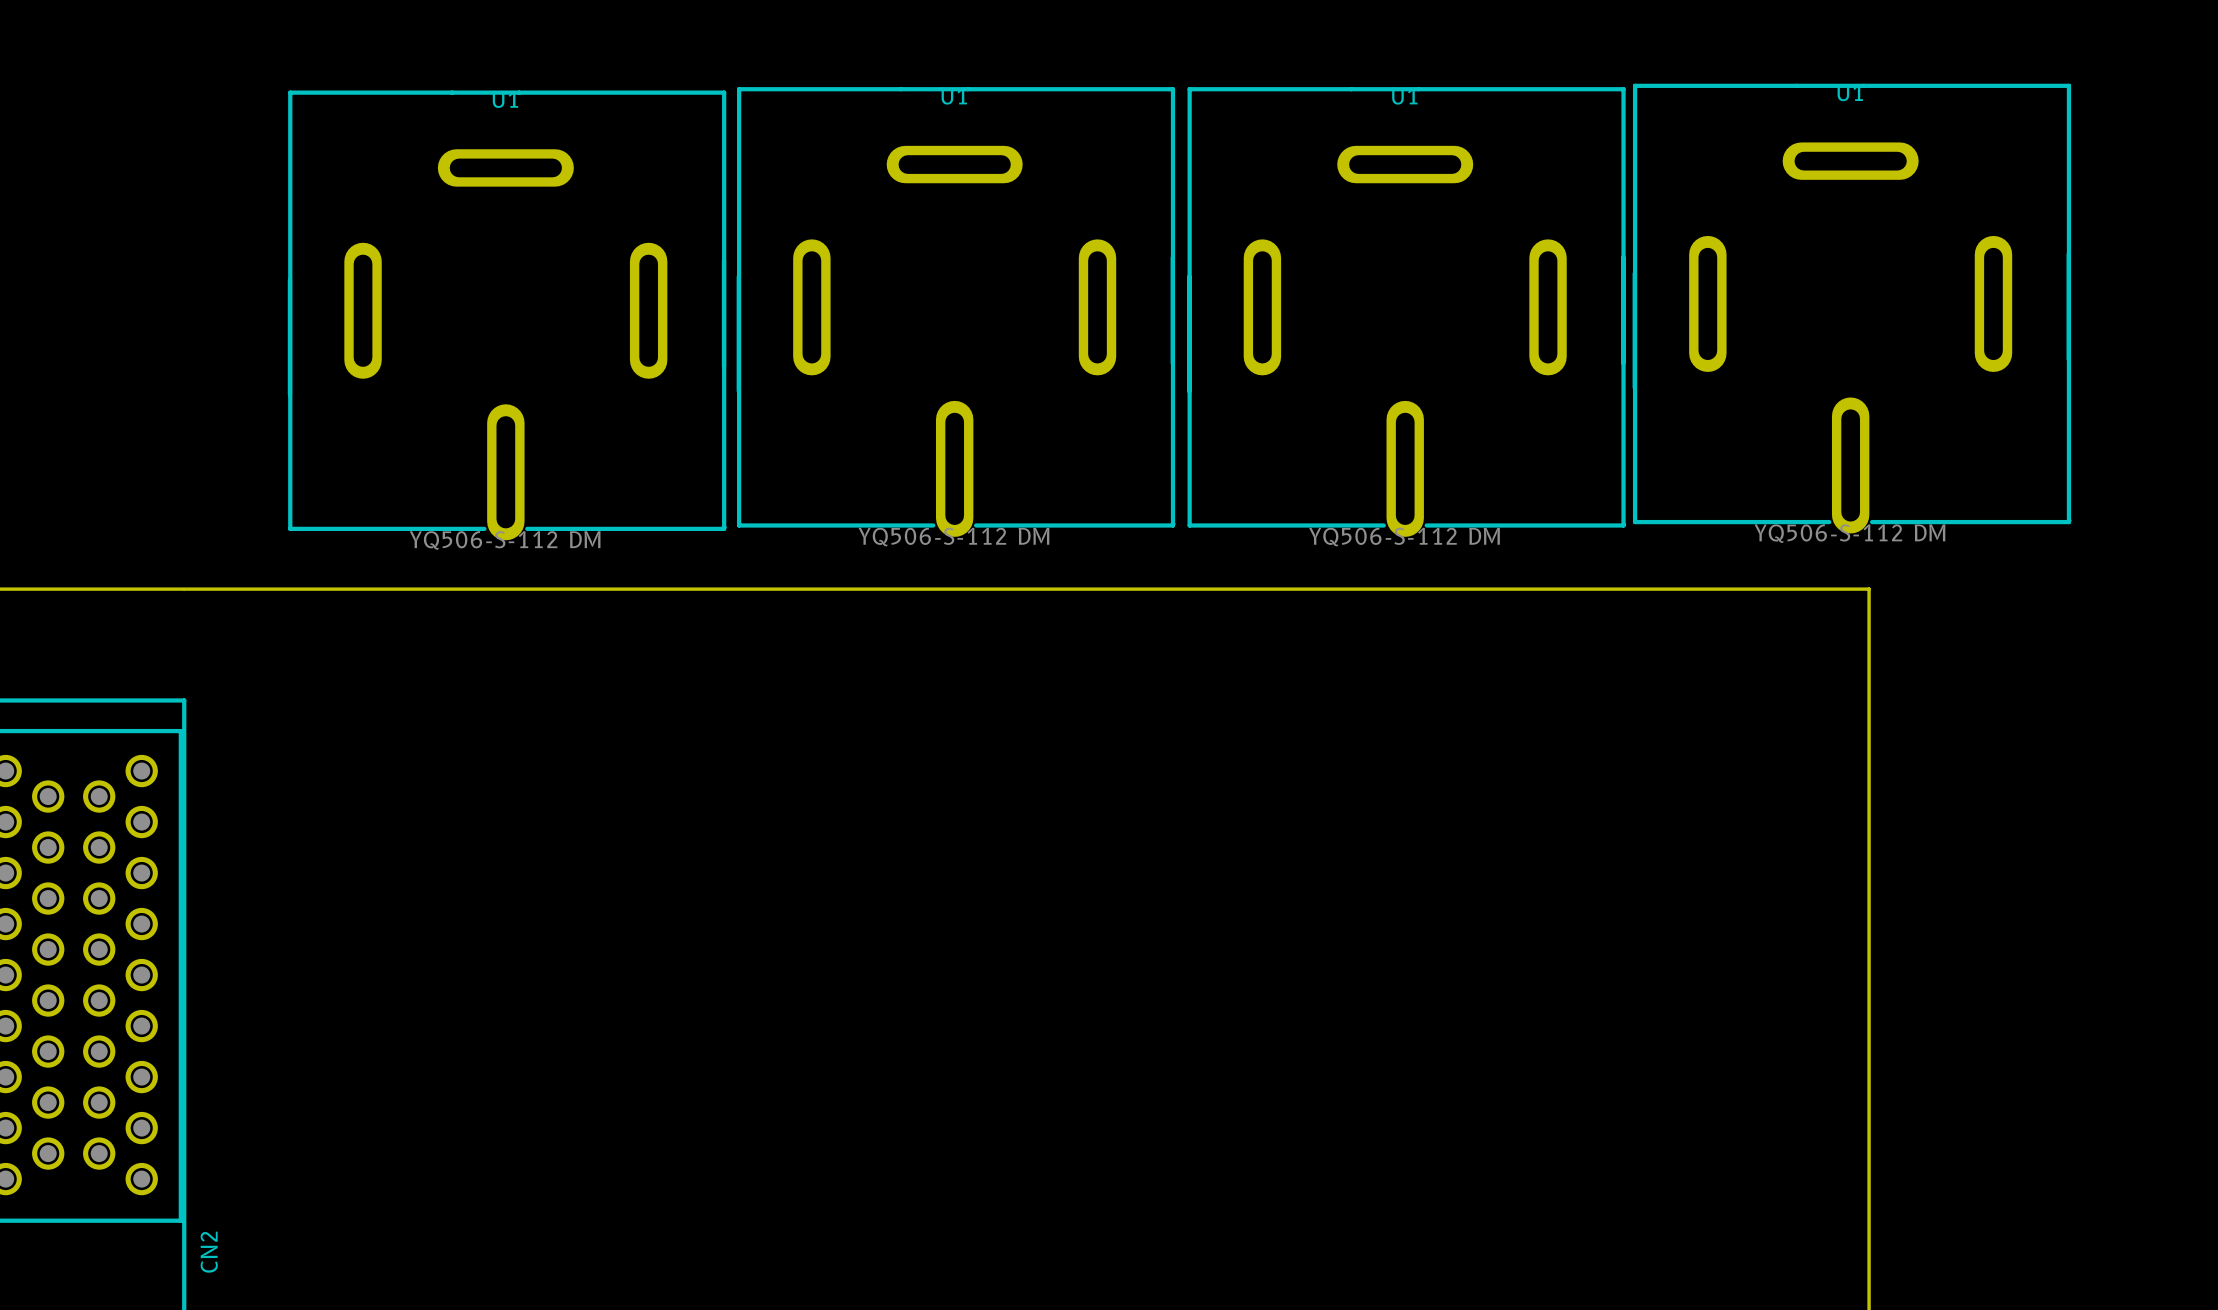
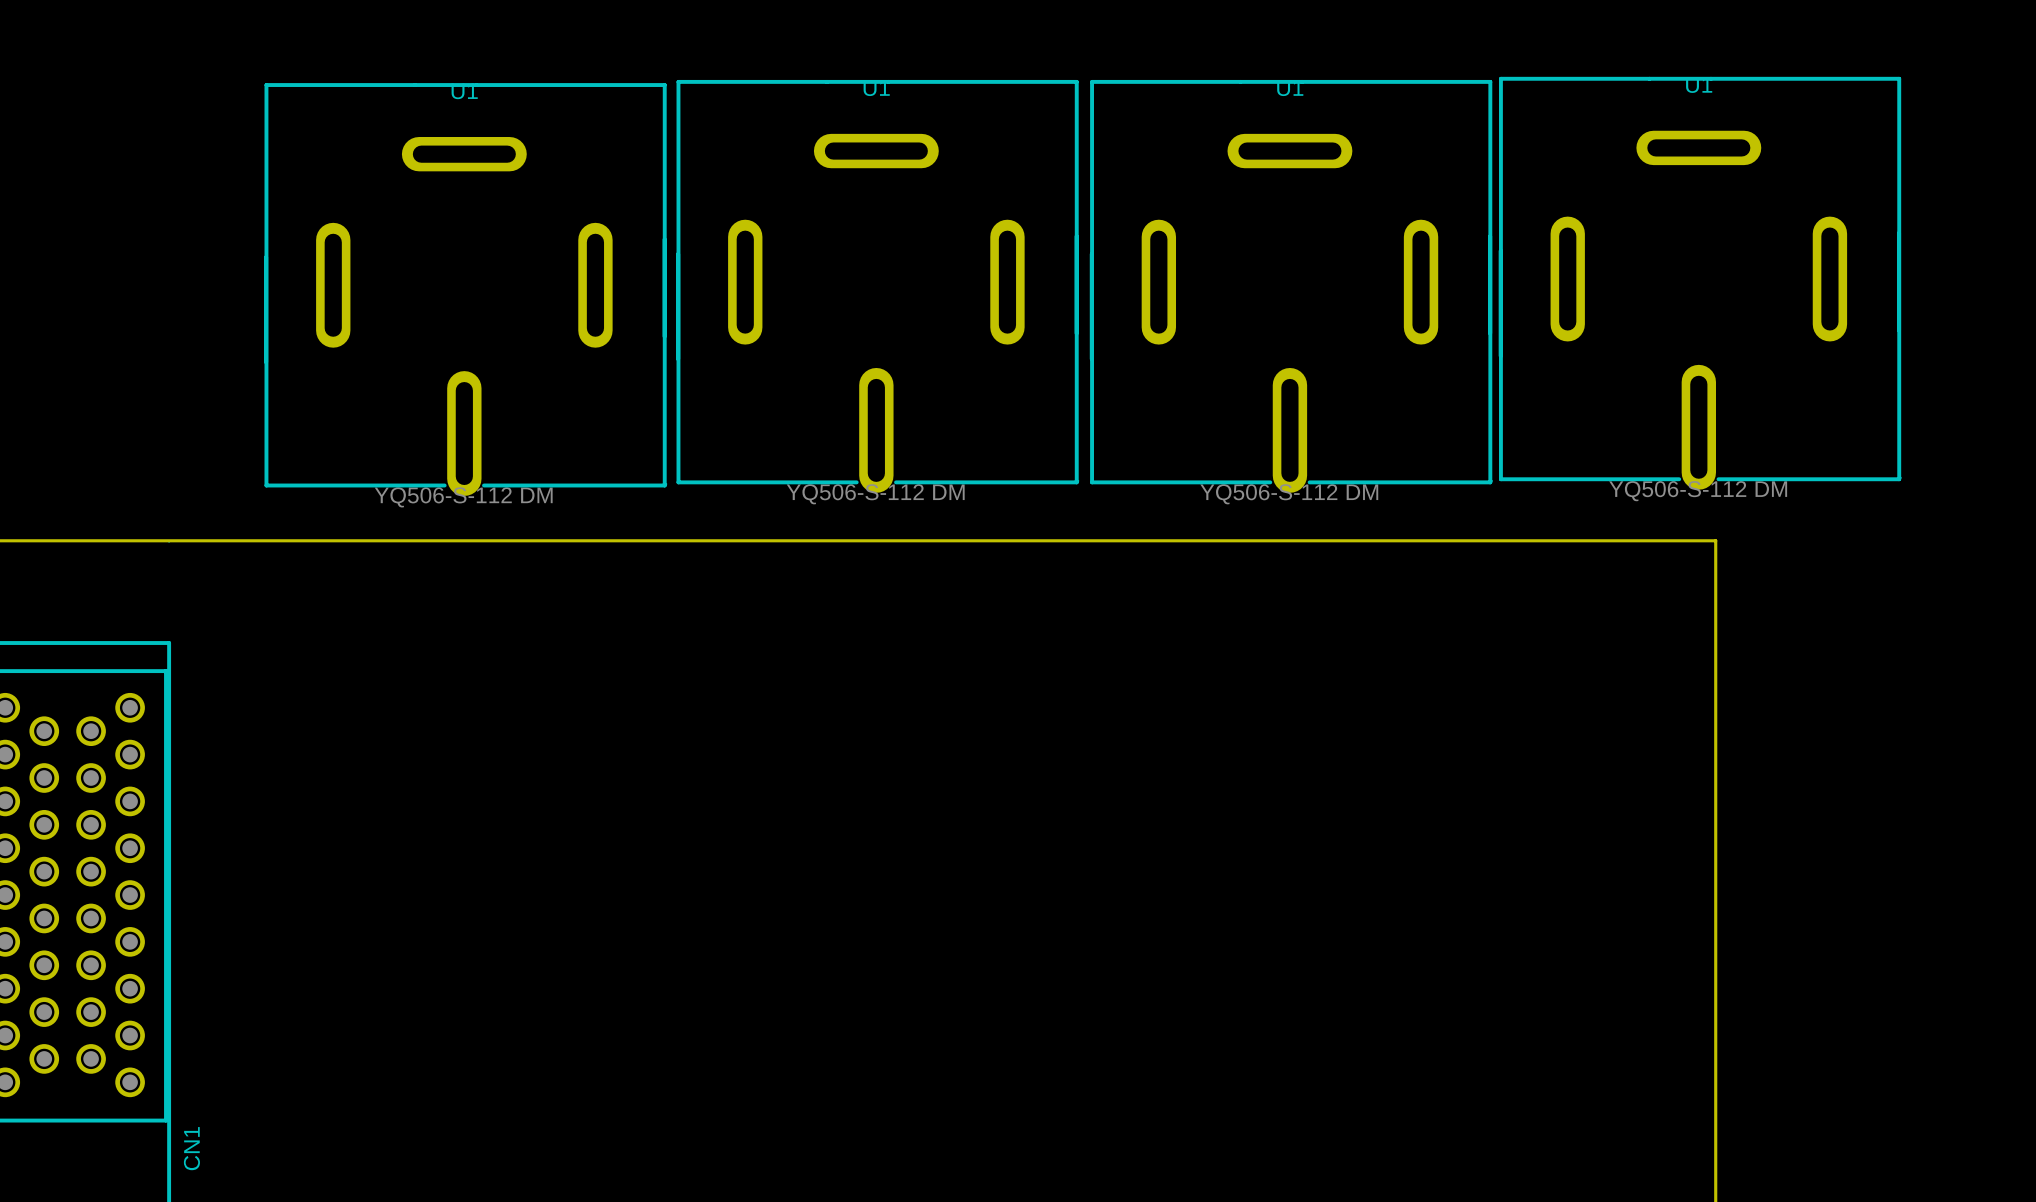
CN2 name: CN2 (209, 1252) -> CN1 (191, 1148)

